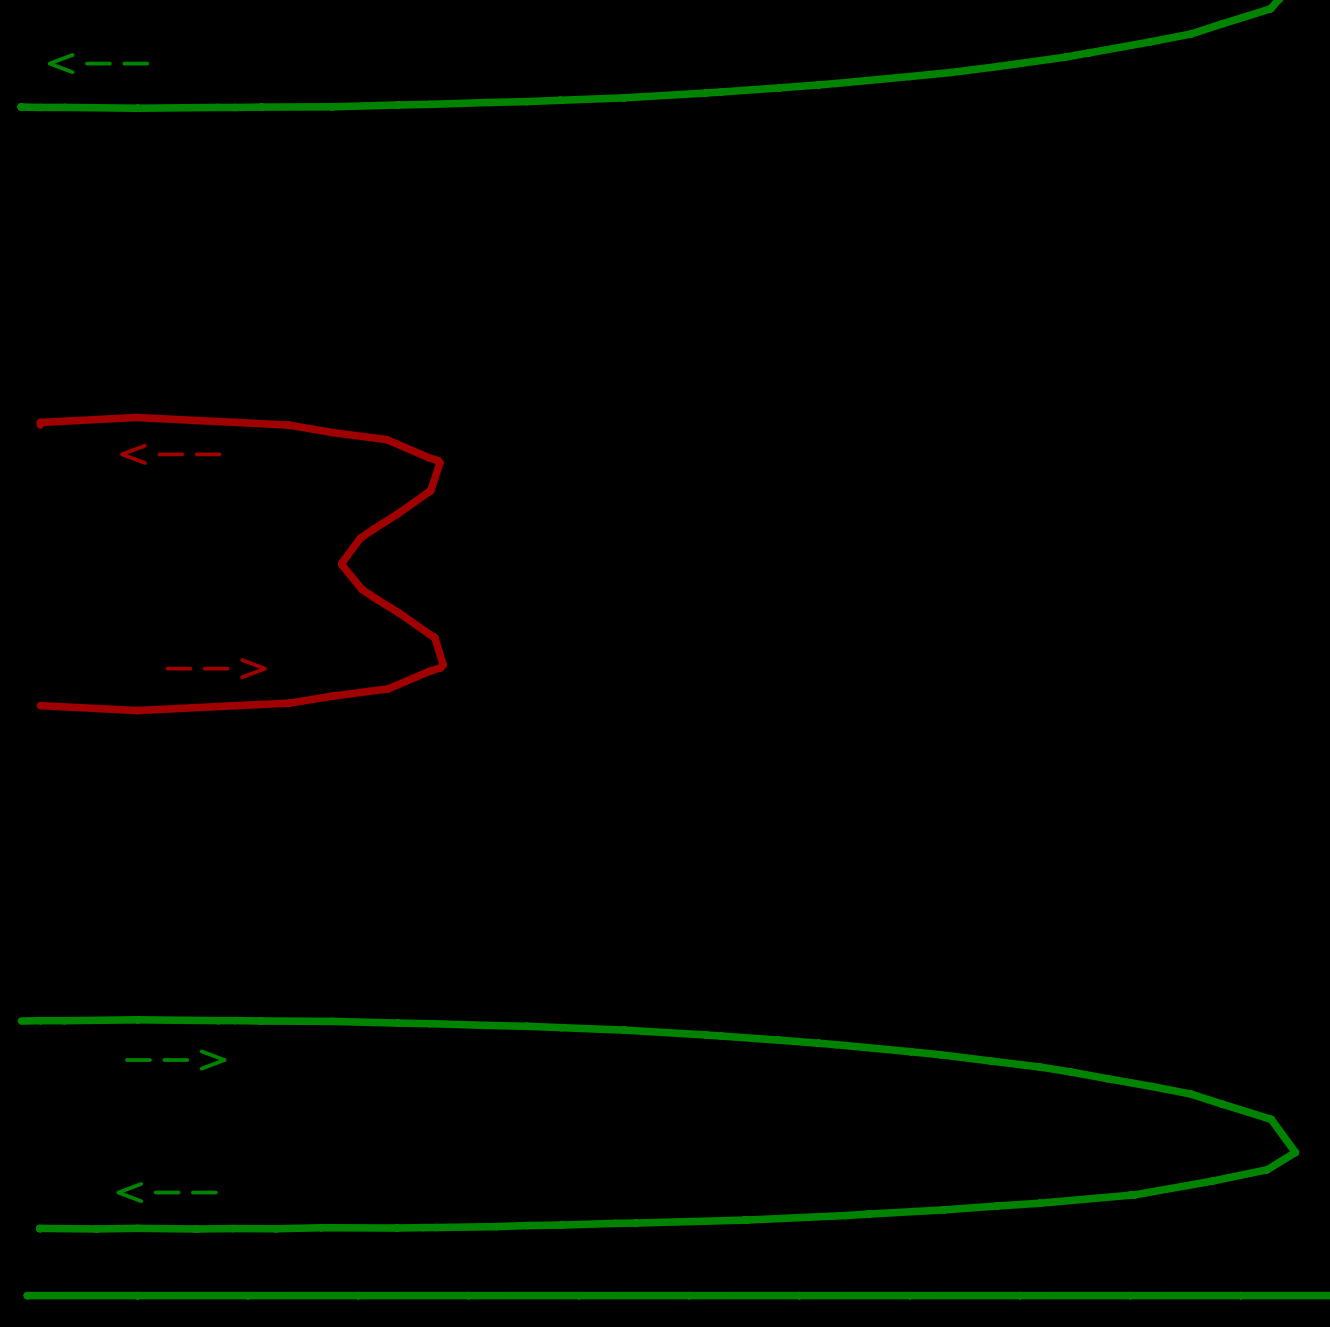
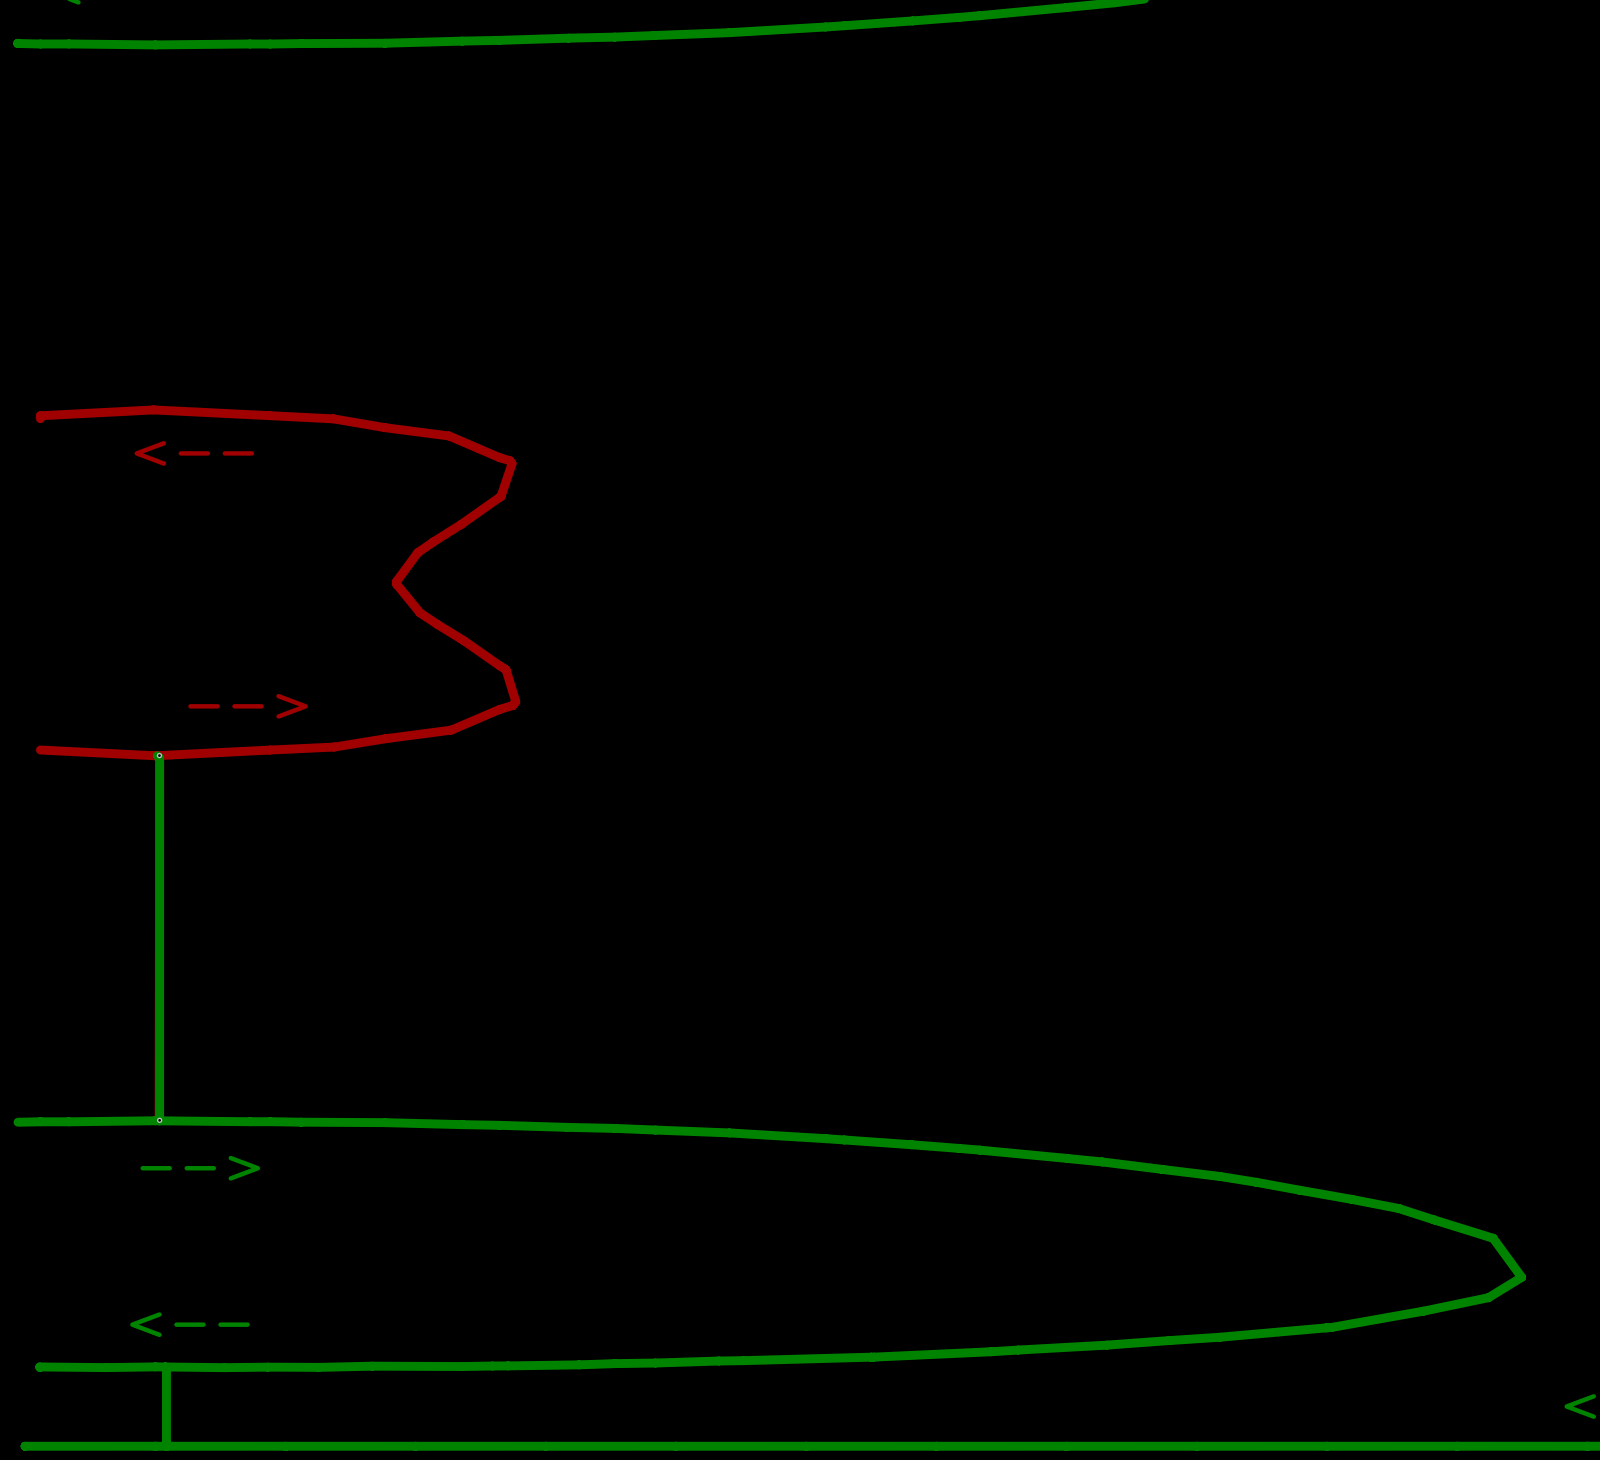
bottom track: none -> (157, 755) (159, 758) (159, 1120)
via: none -> (159, 755)
via: none -> (159, 1120)
bottom track: none -> (165, 1366) (166, 1446)

